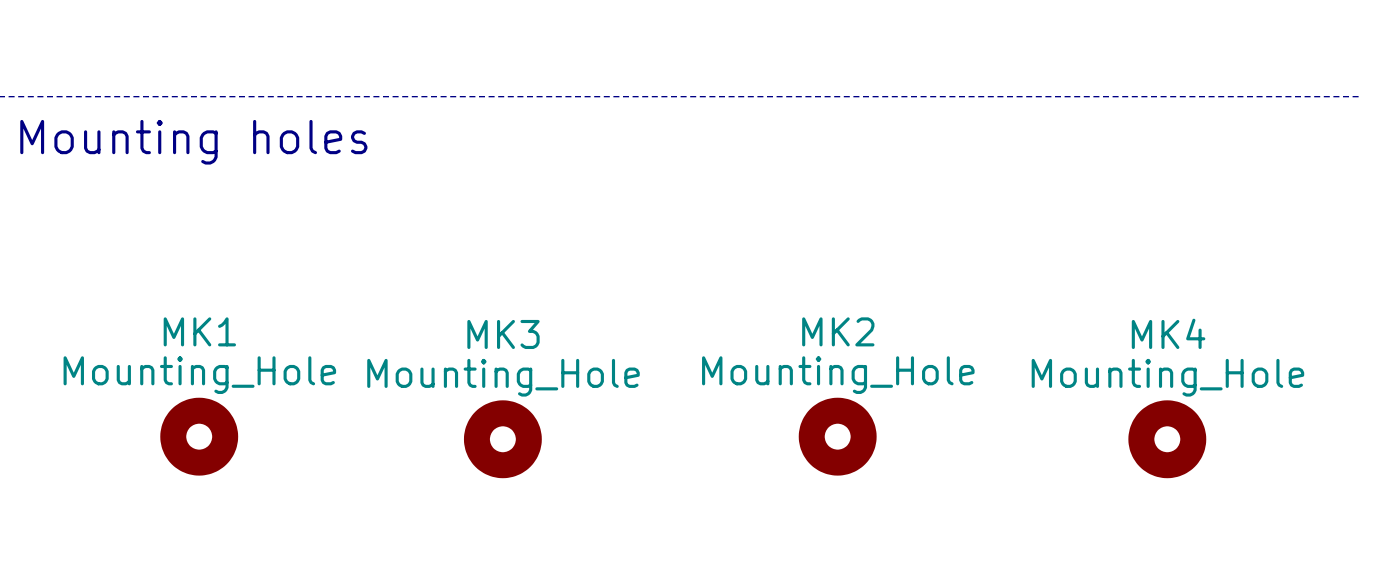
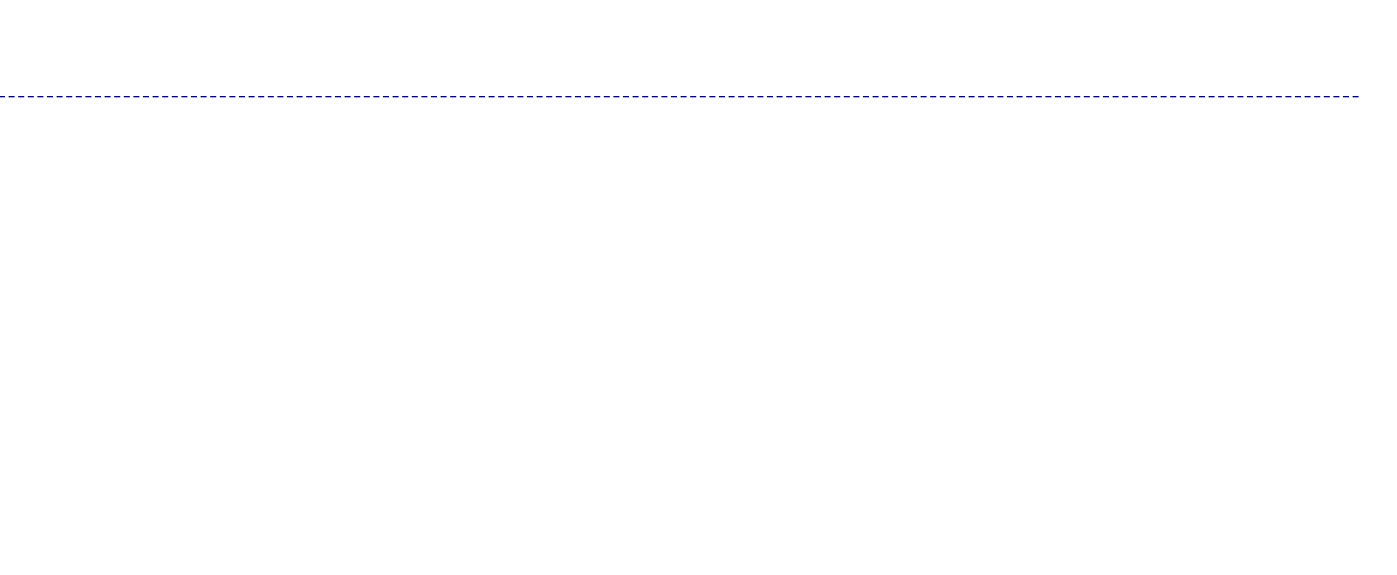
text: Mounting holes (193, 142) -> none
MK1: Mounting_Hole (199, 436) -> none
MK2: Mounting_Hole (837, 436) -> none
MK3: Mounting_Hole (502, 439) -> none
MK4: Mounting_Hole (1167, 439) -> none

